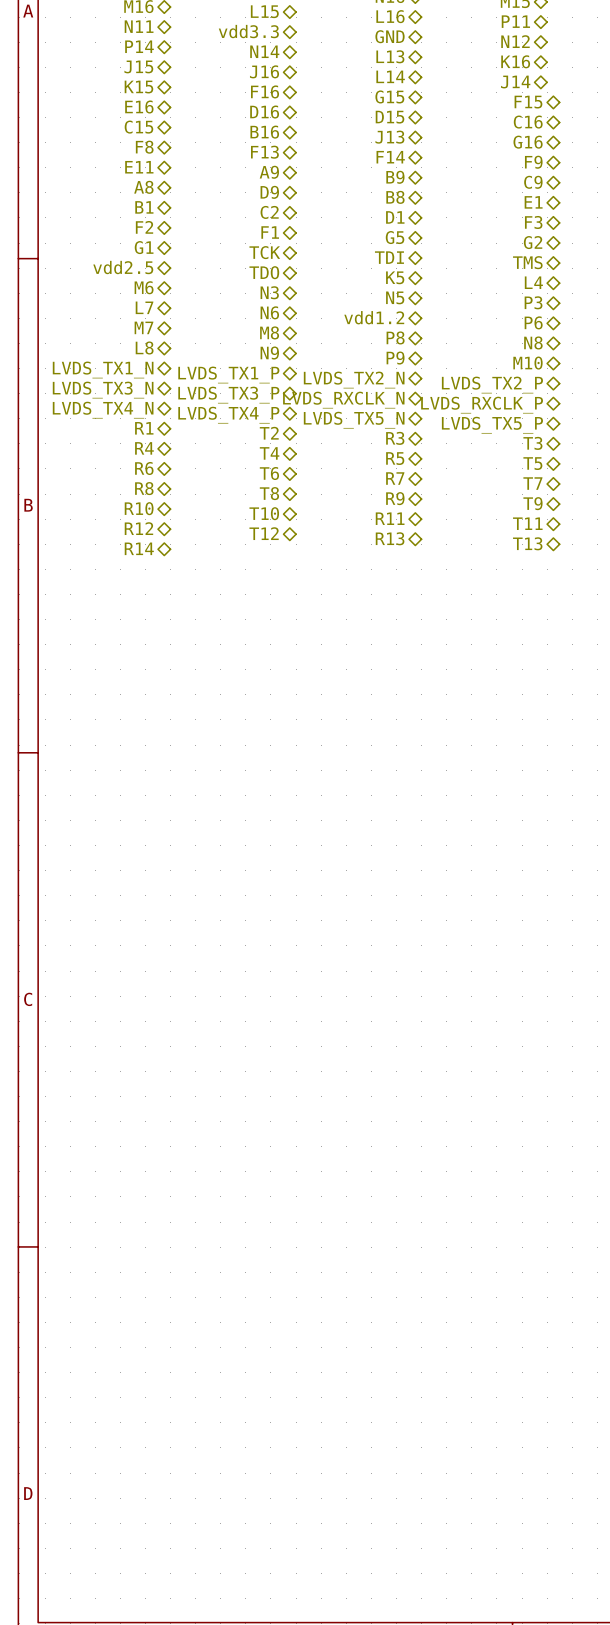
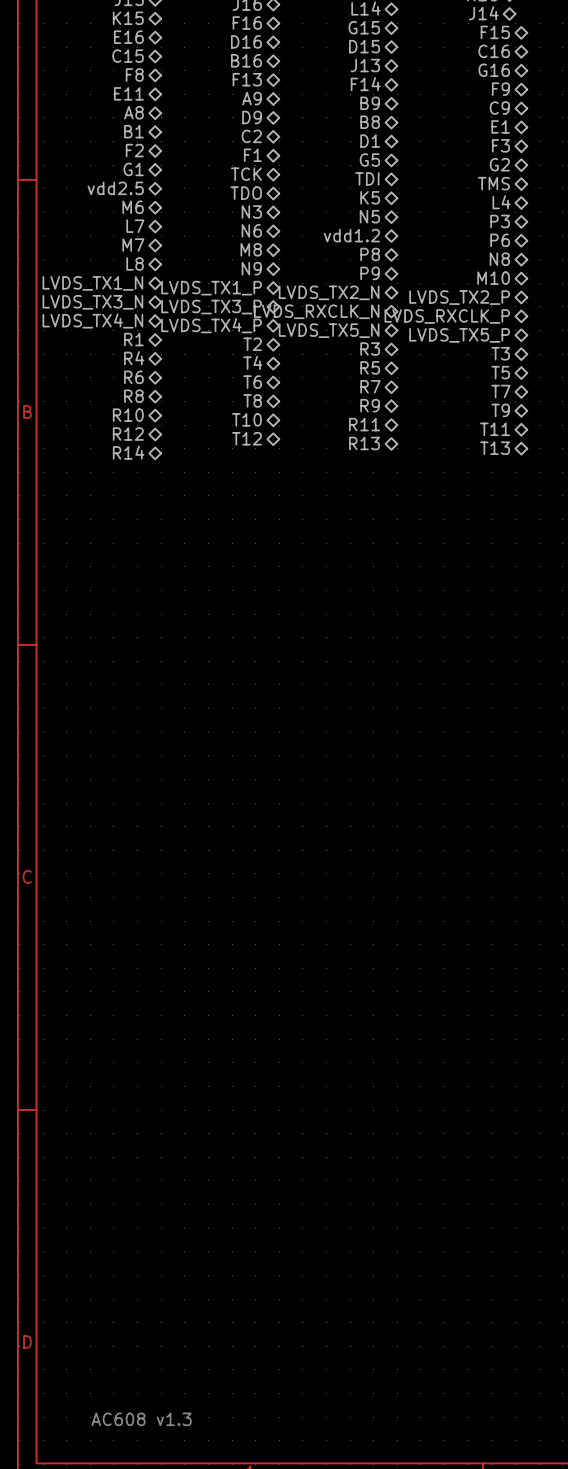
text: none -> AC608 v1.3 (141, 1419)

